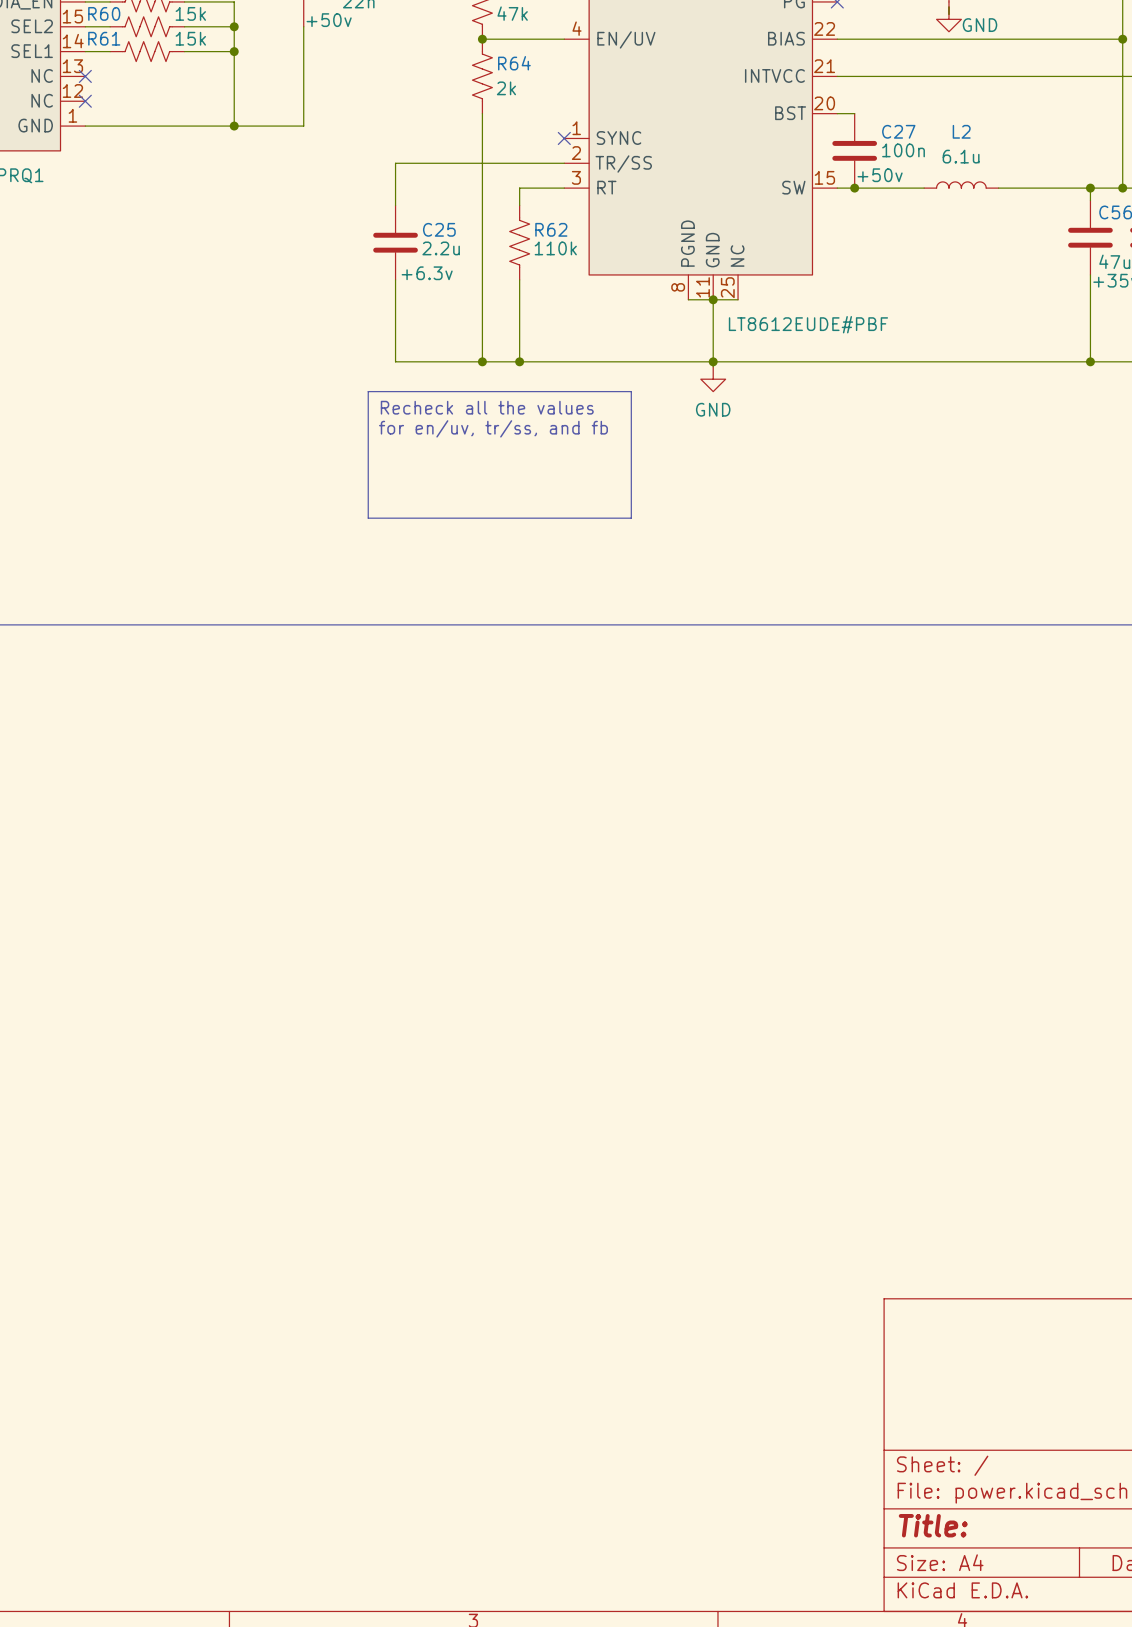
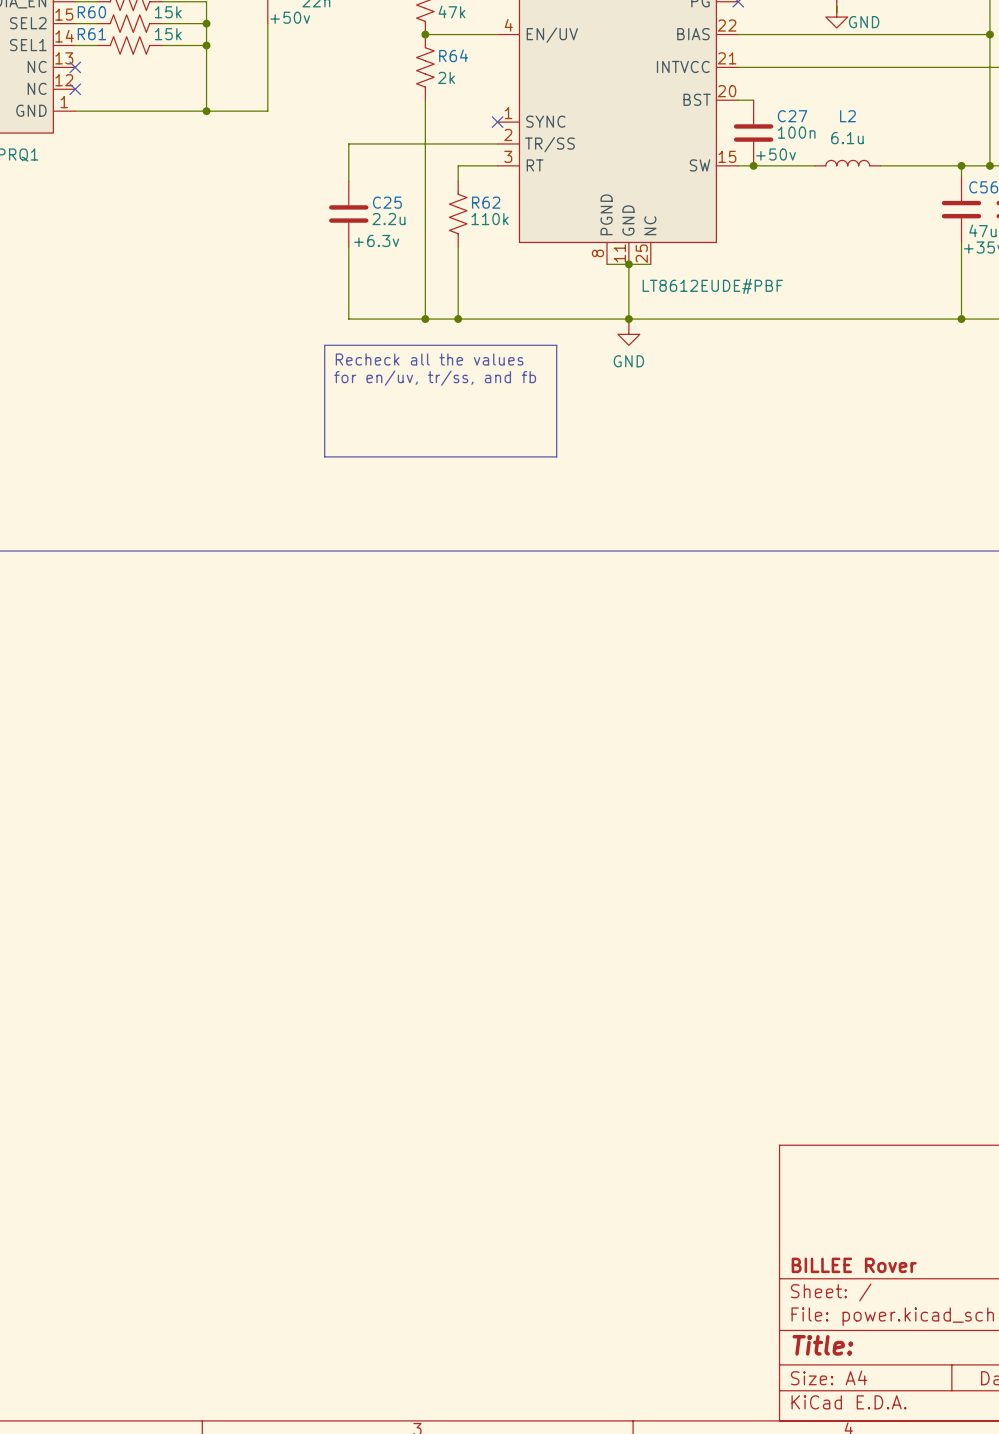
title block: none -> BILLEE Rover (854, 1265)

